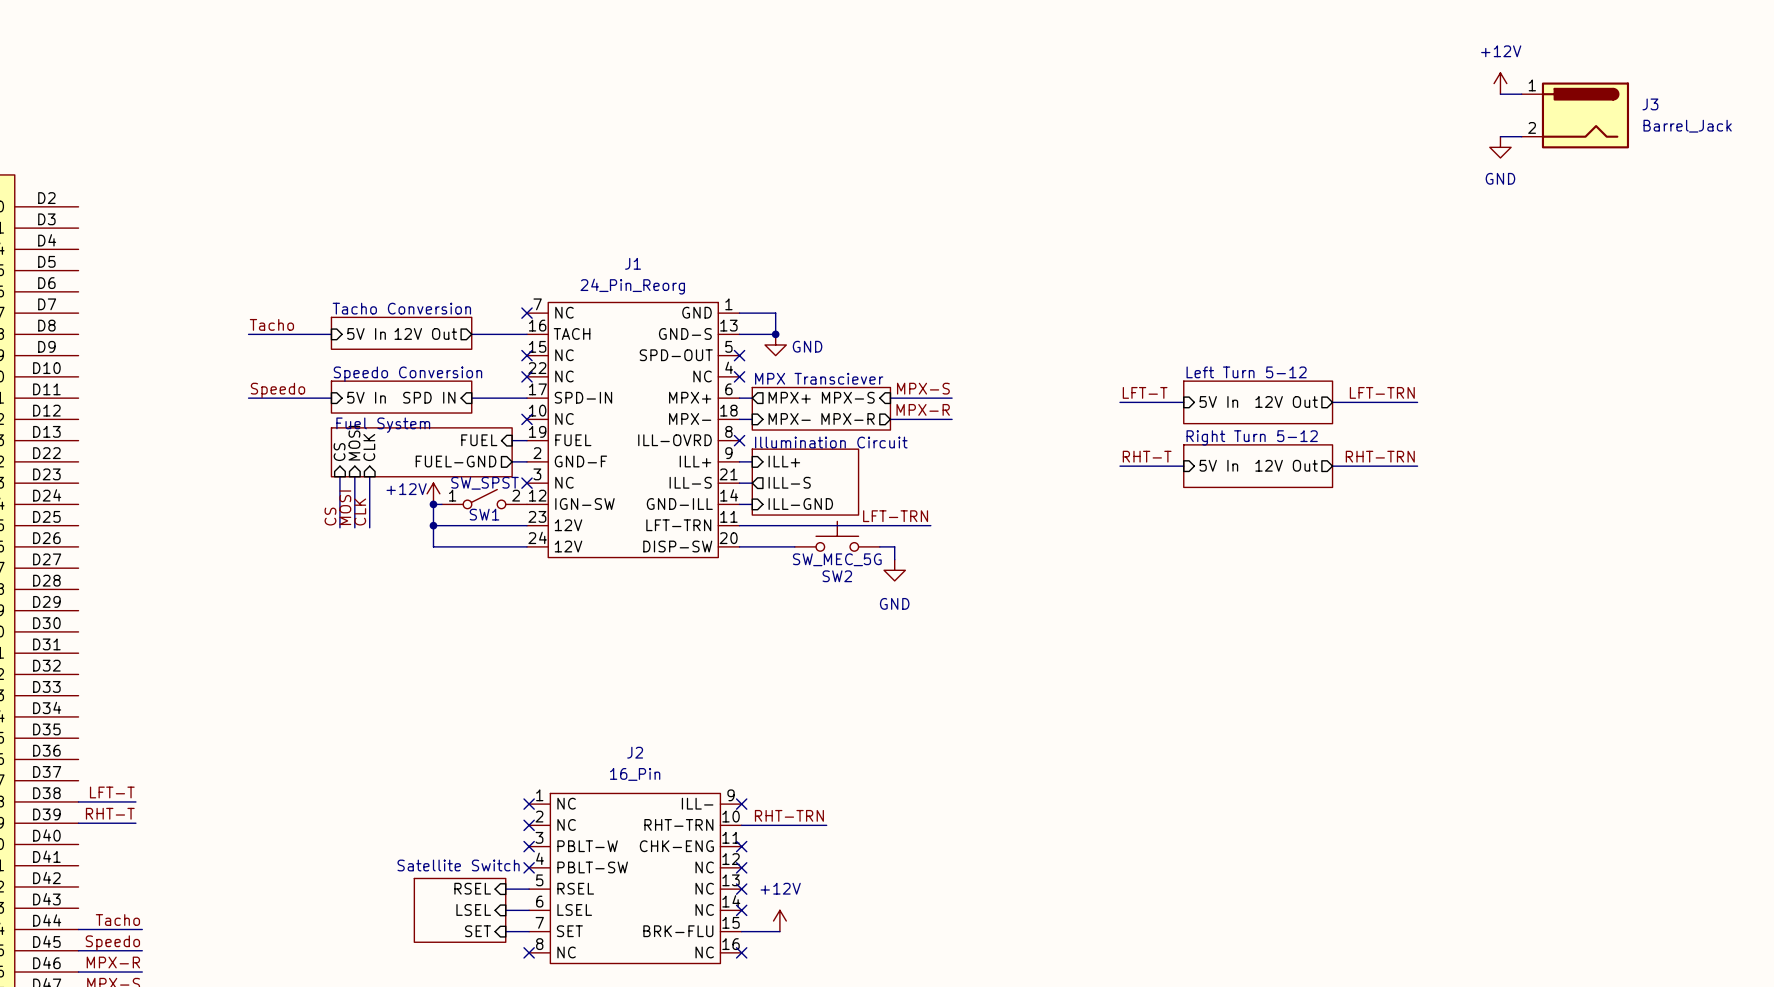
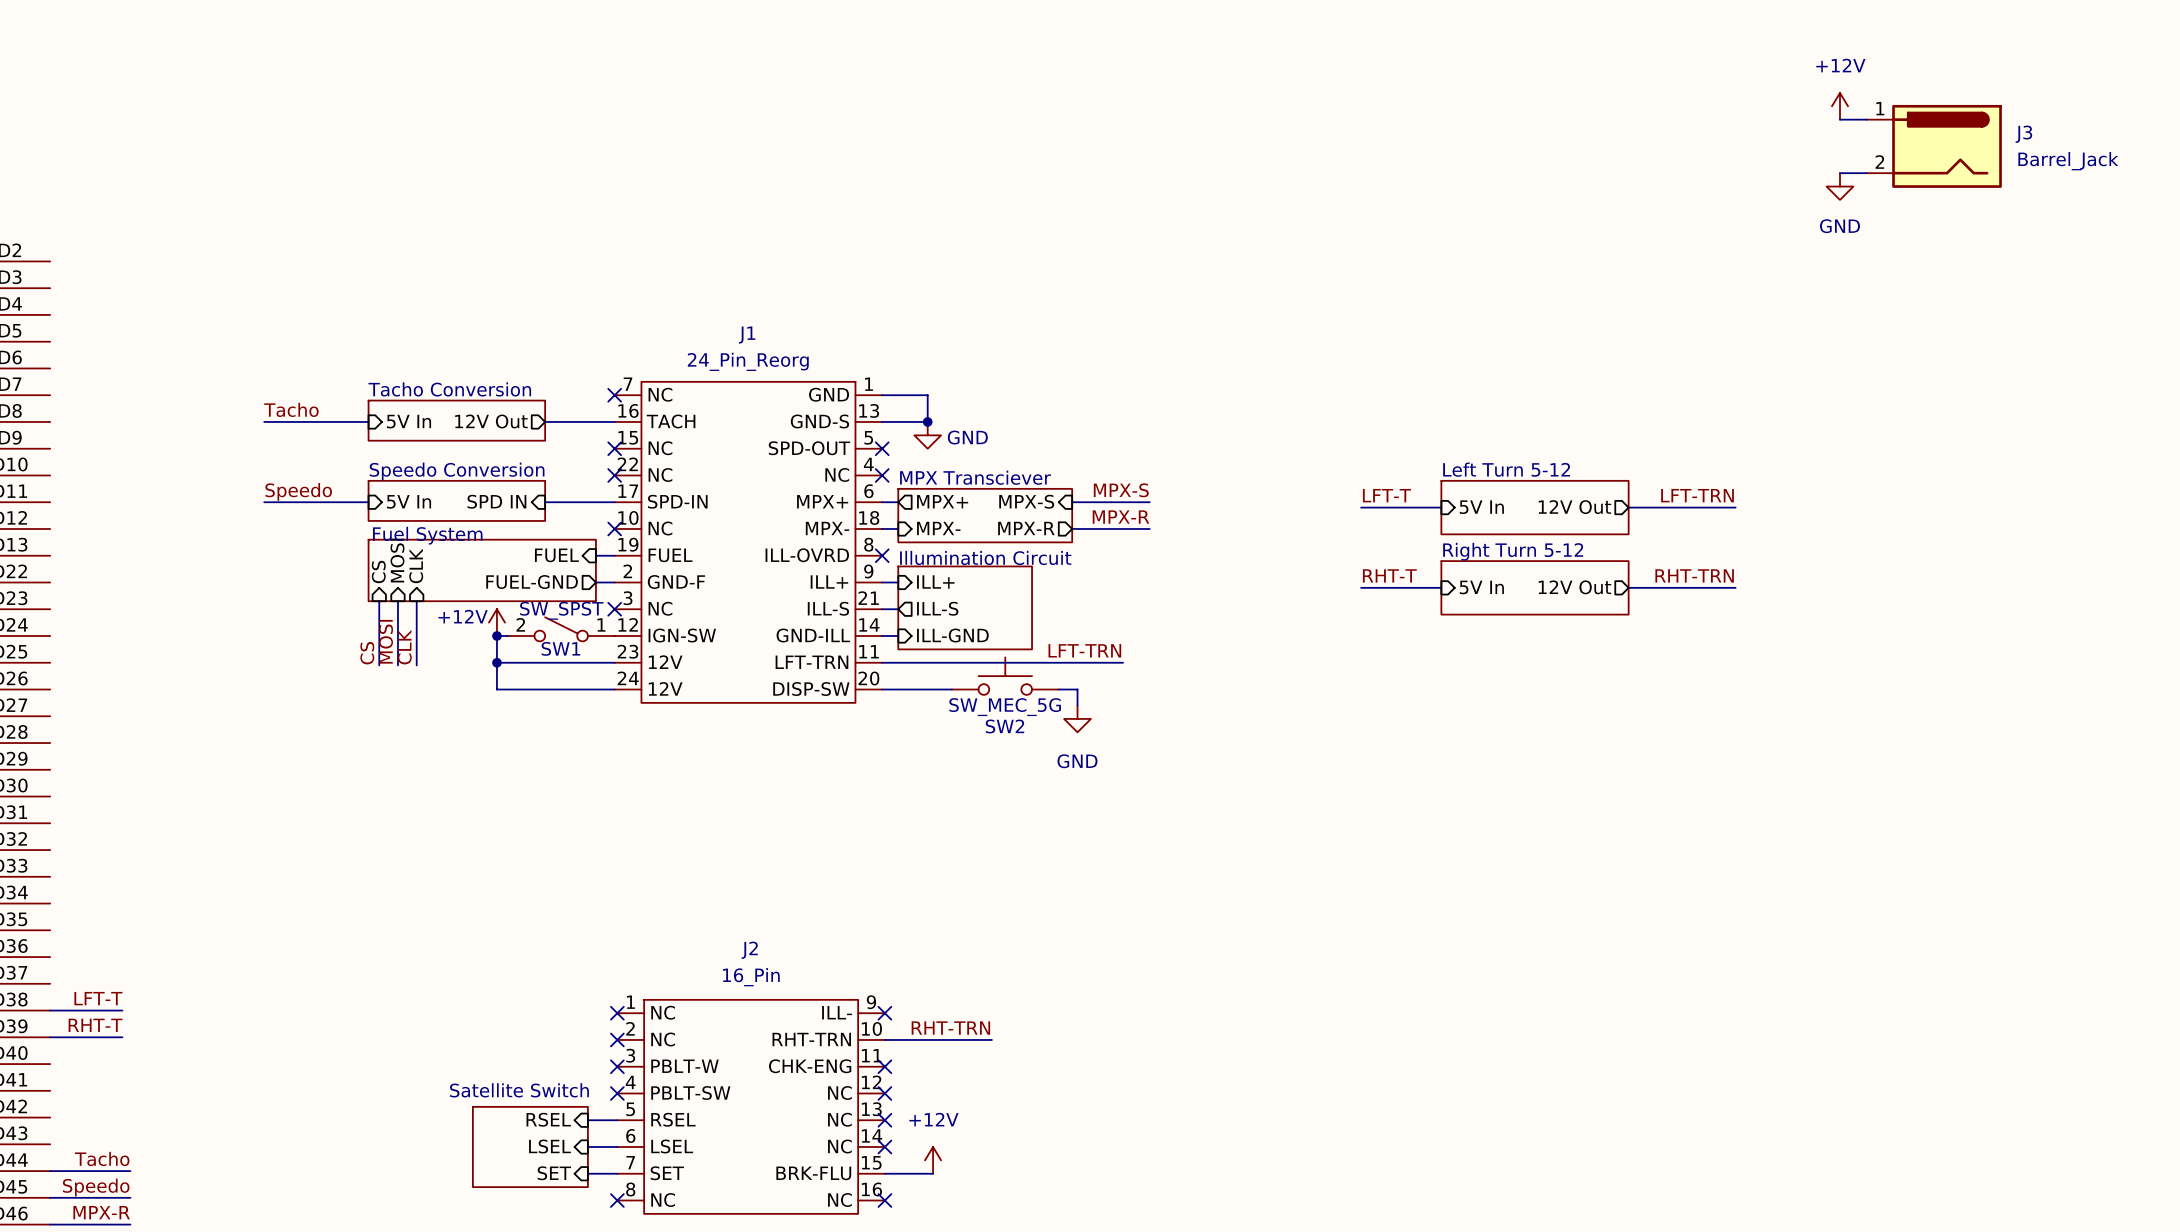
SW1 flip: as is (484, 499) -> left-right (561, 629)

